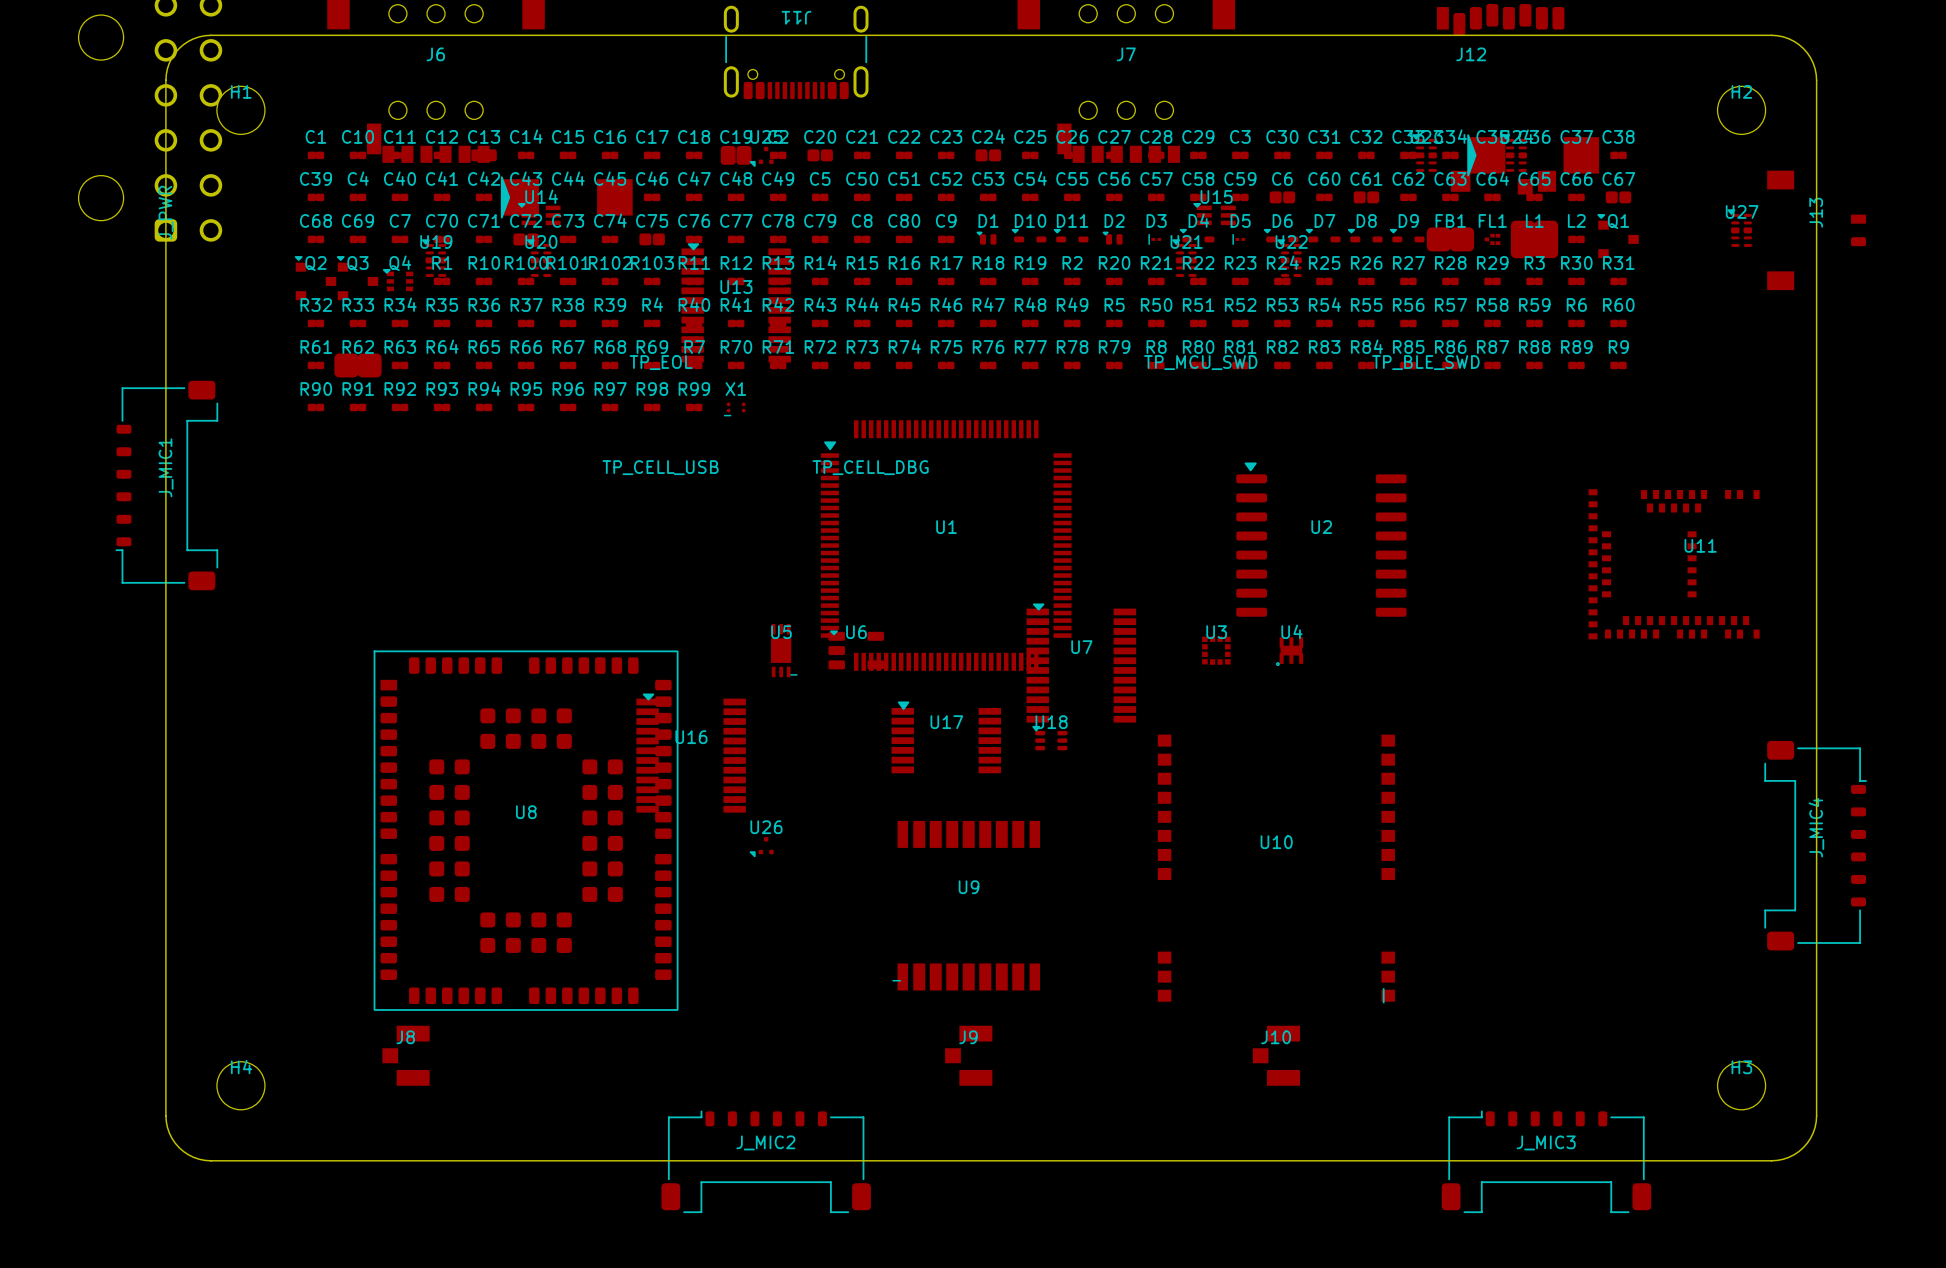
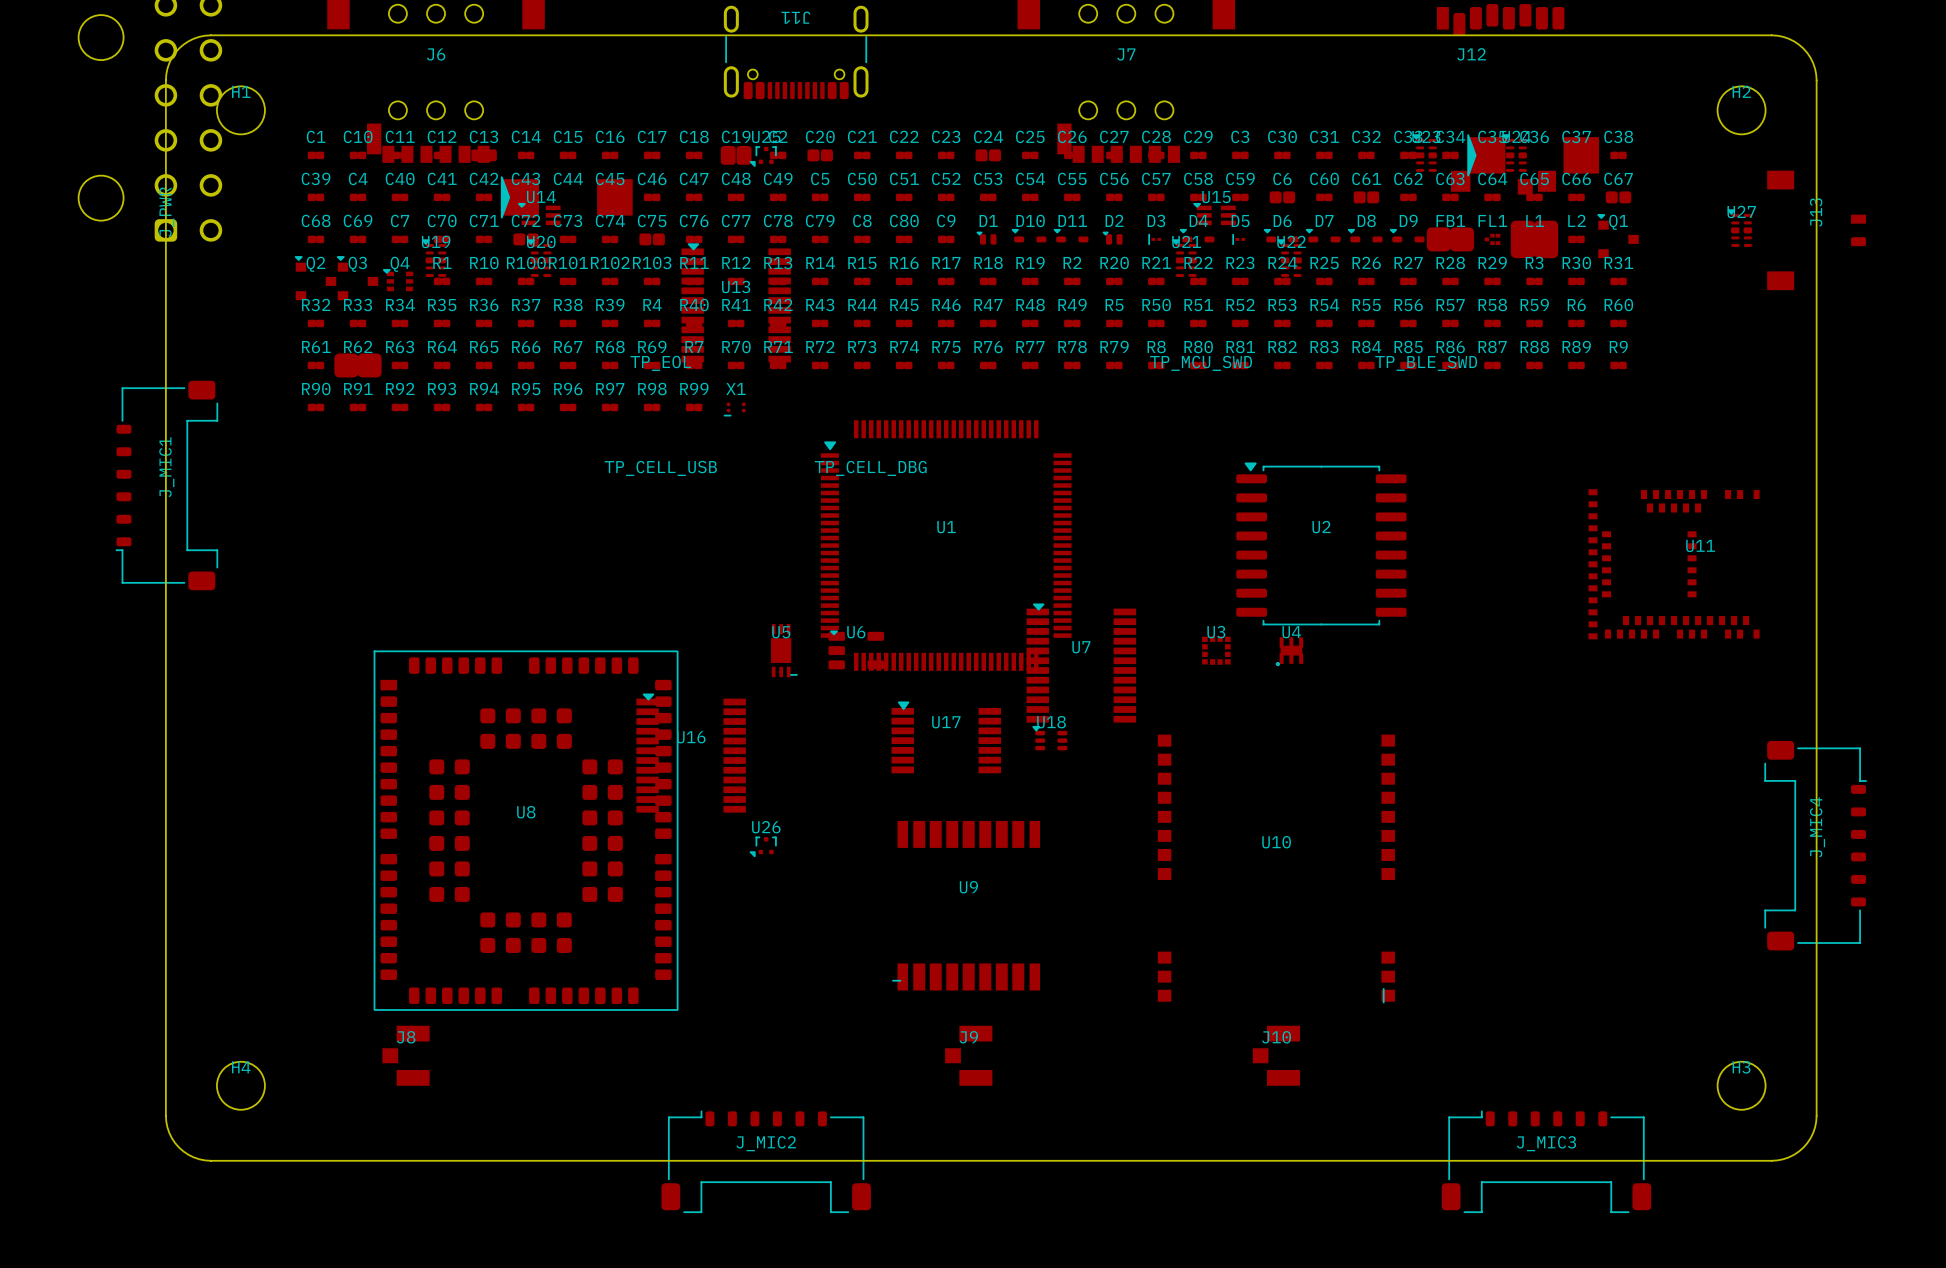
U25 footprint: [749, 146, 774, 167] -> [749, 146, 777, 167]
U2 footprint: [1236, 462, 1407, 617] -> [1236, 462, 1407, 626]
U26 footprint: [749, 837, 774, 858] -> [749, 836, 777, 858]

